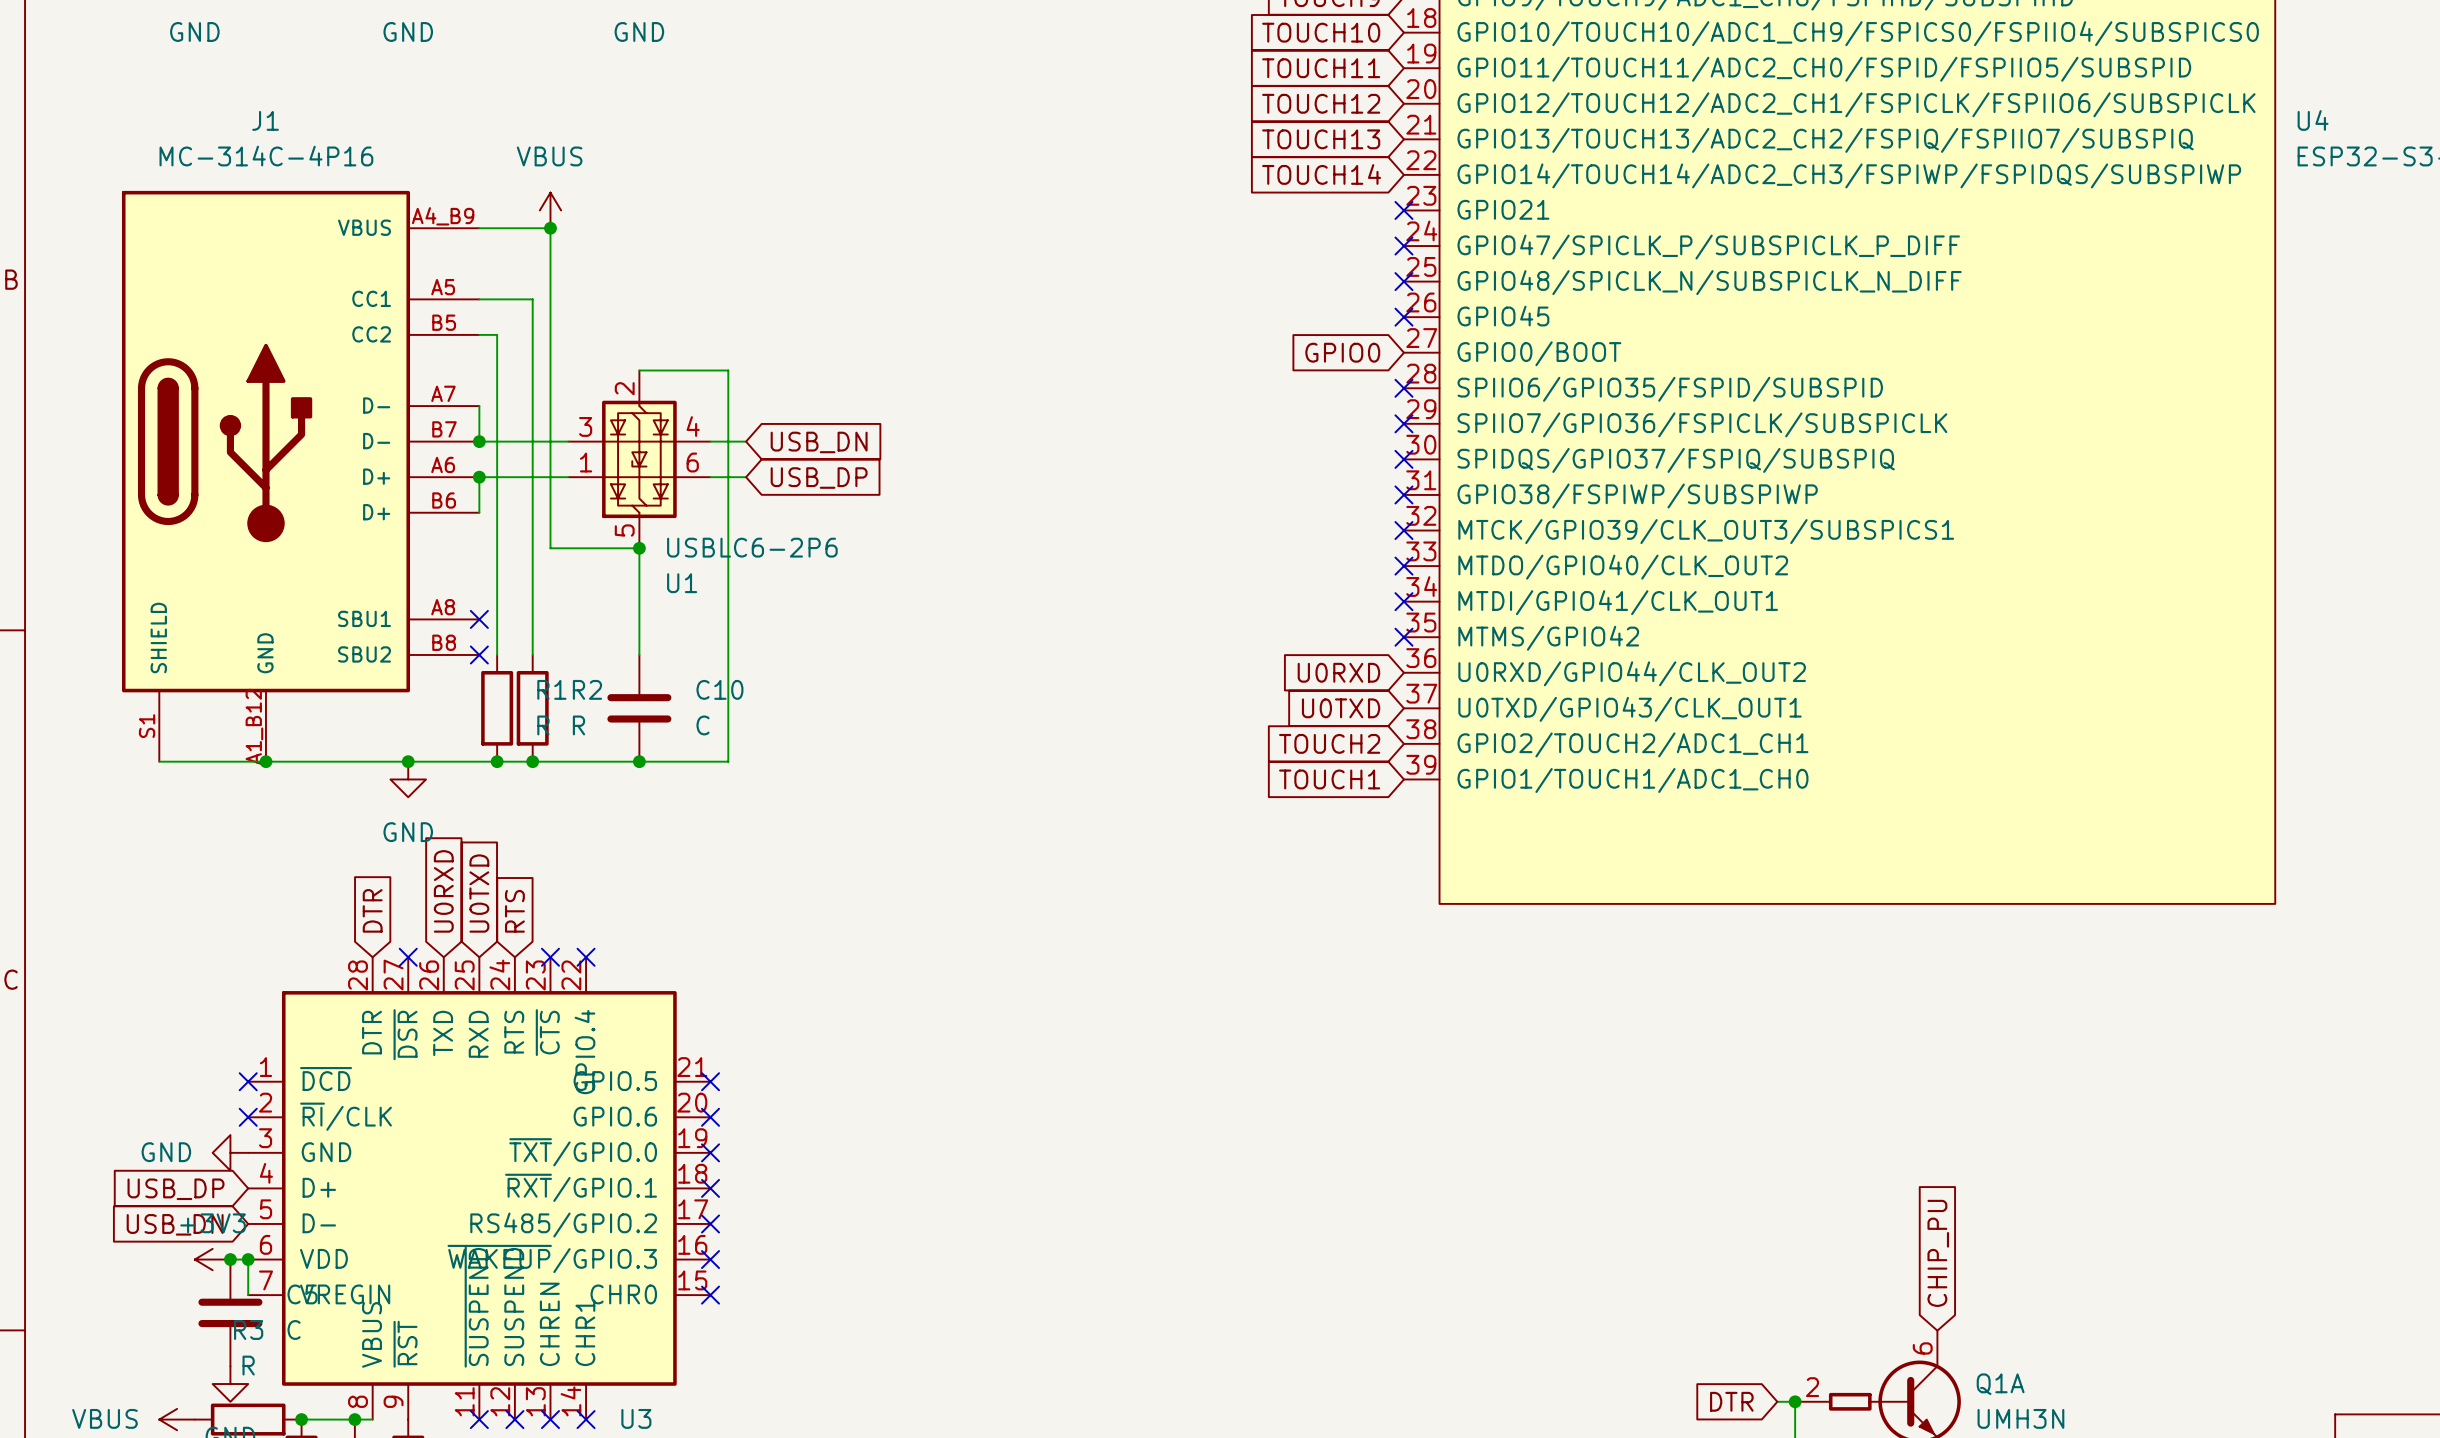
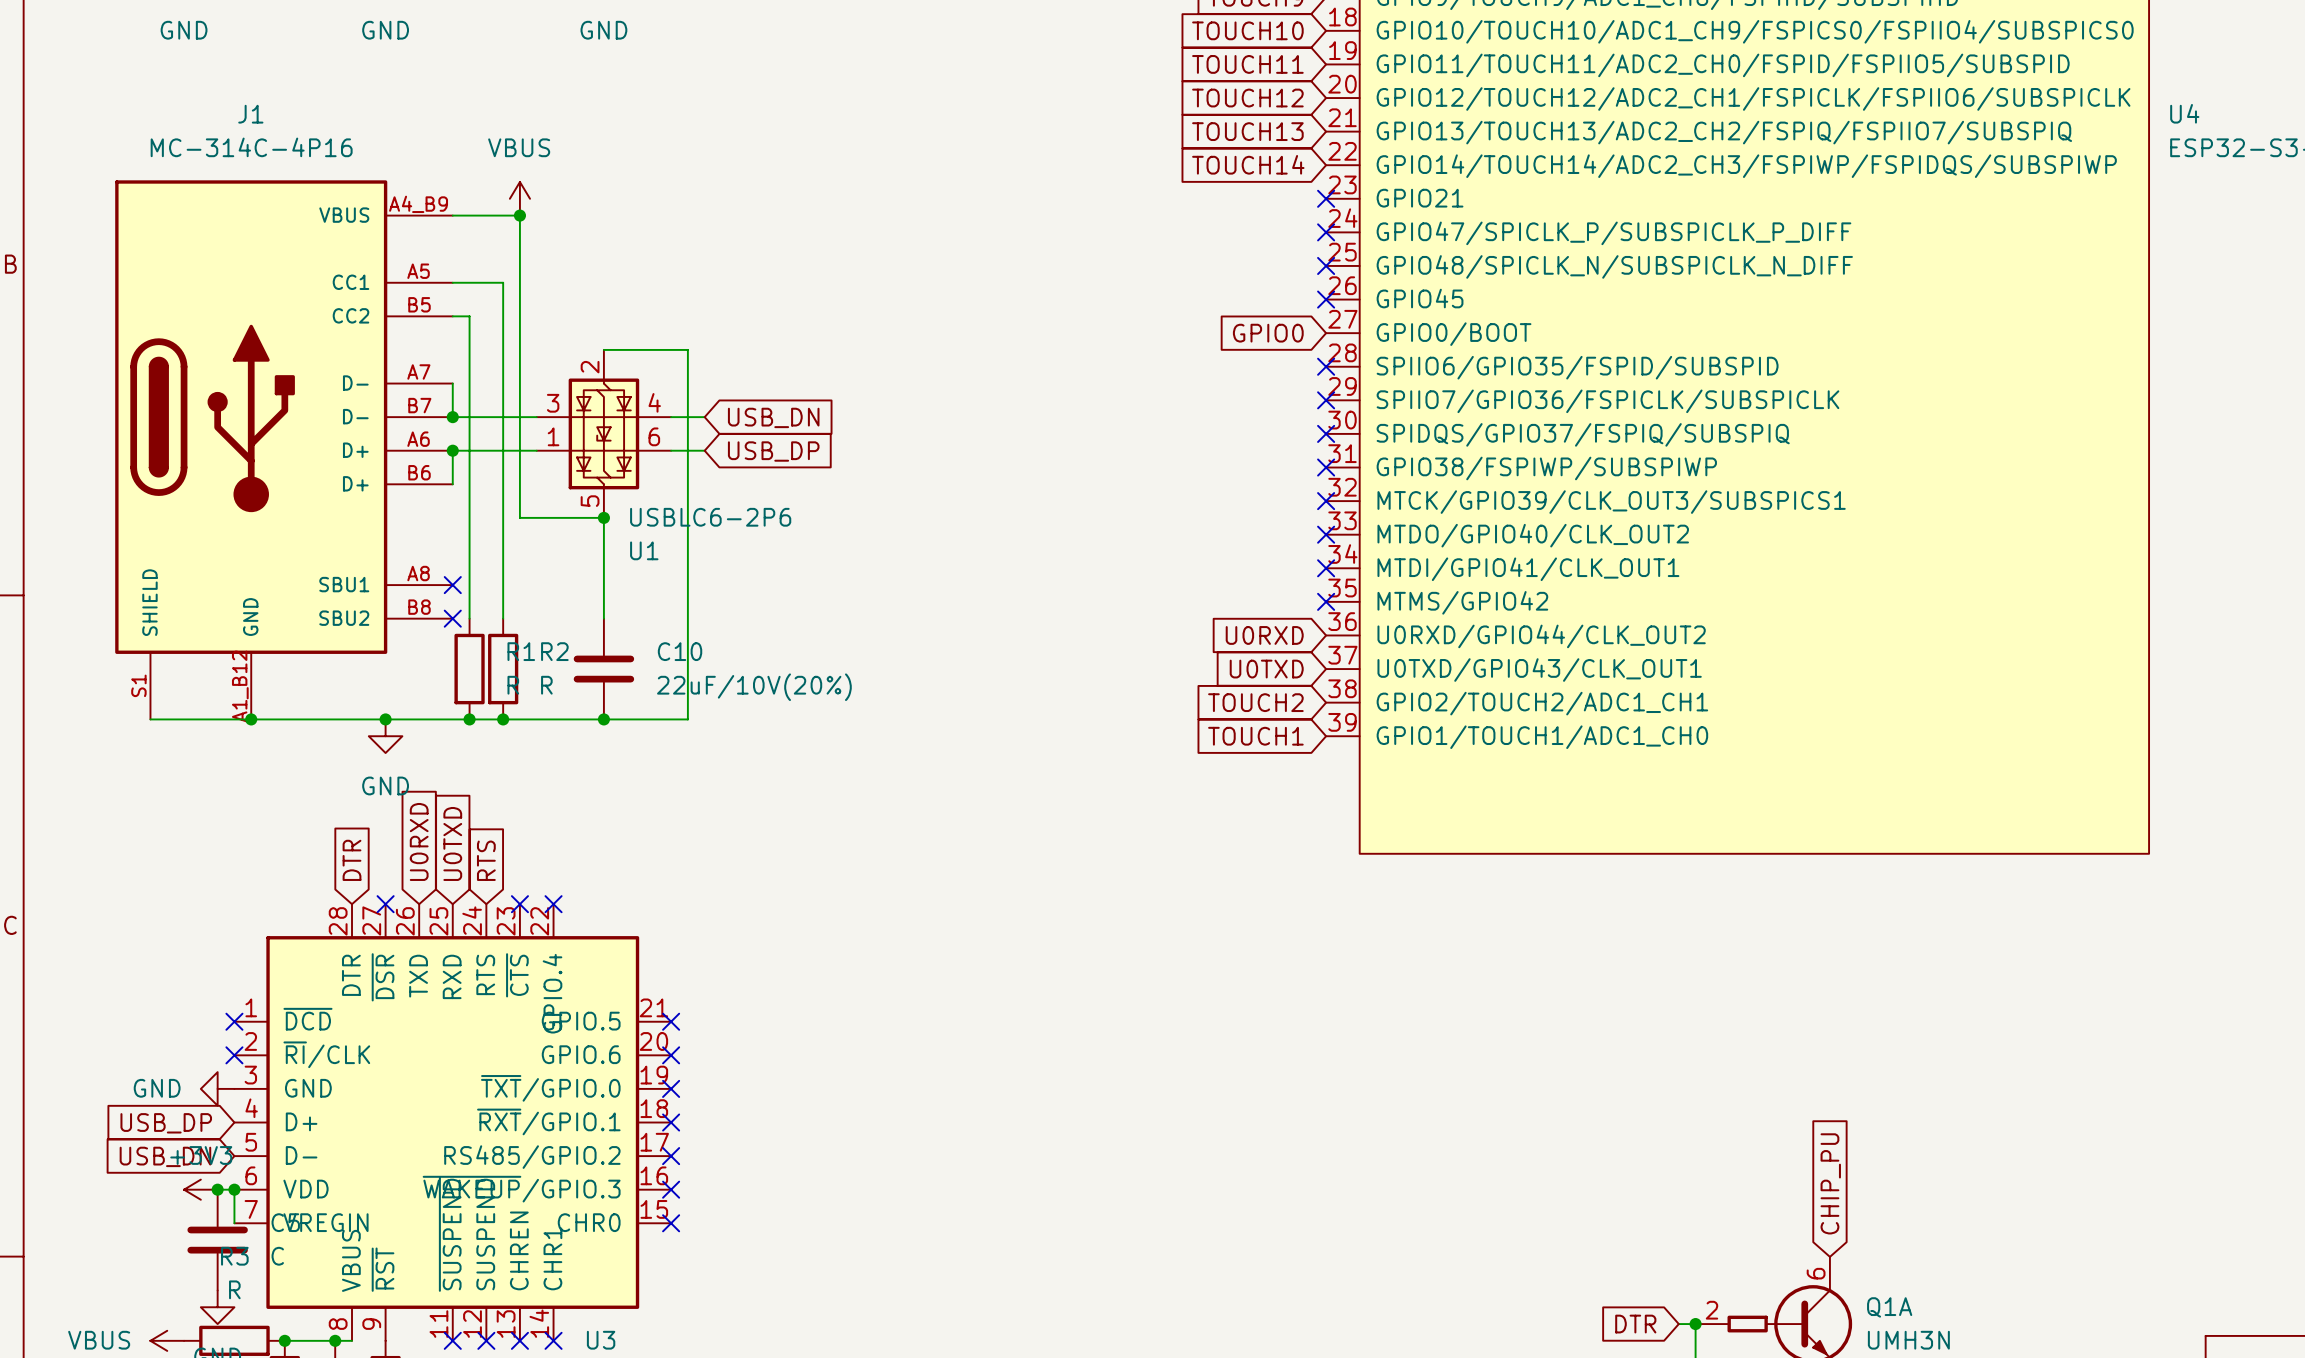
C10 value: C (703, 725) -> 22uF/10V(20%) (754, 687)

